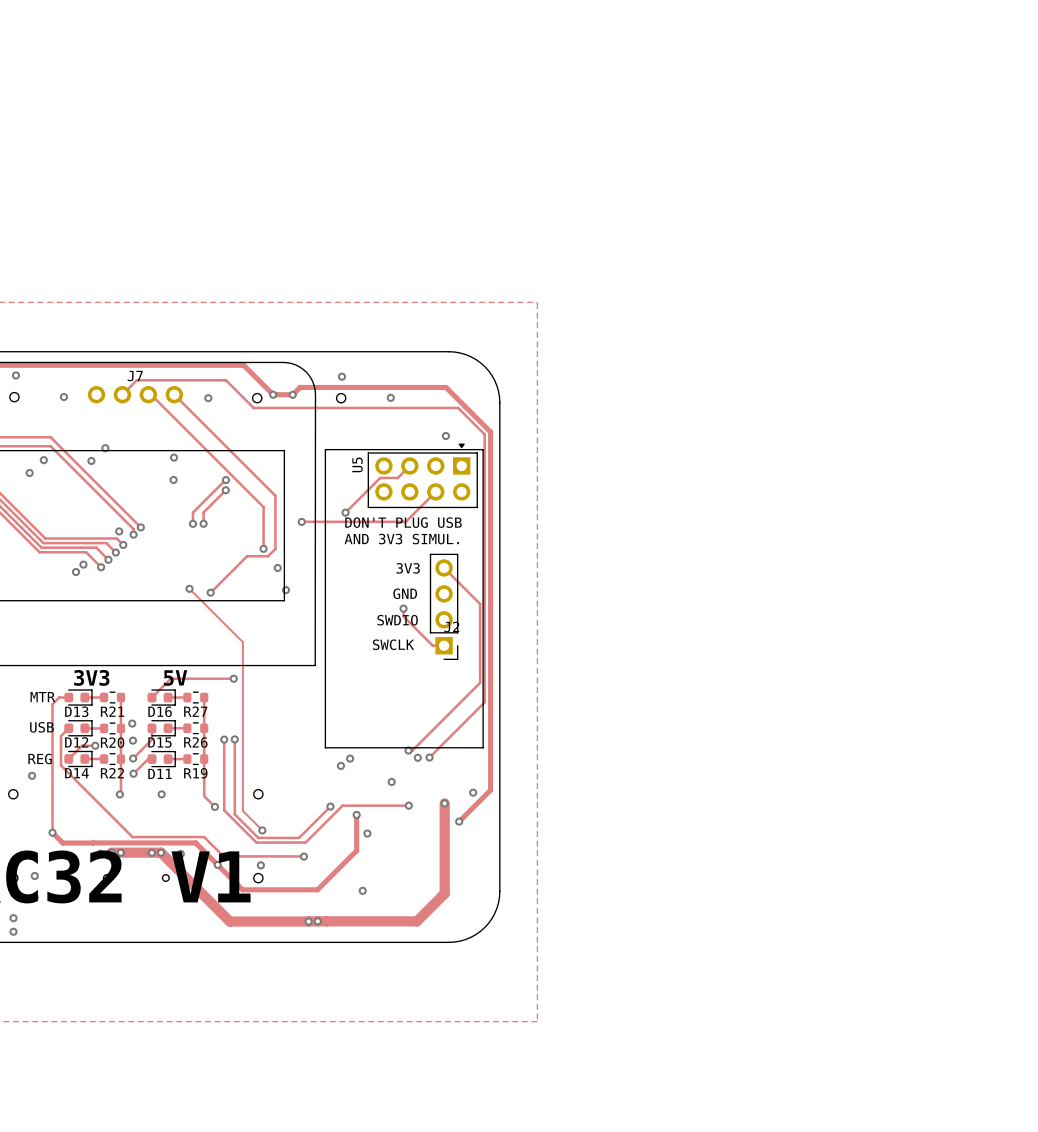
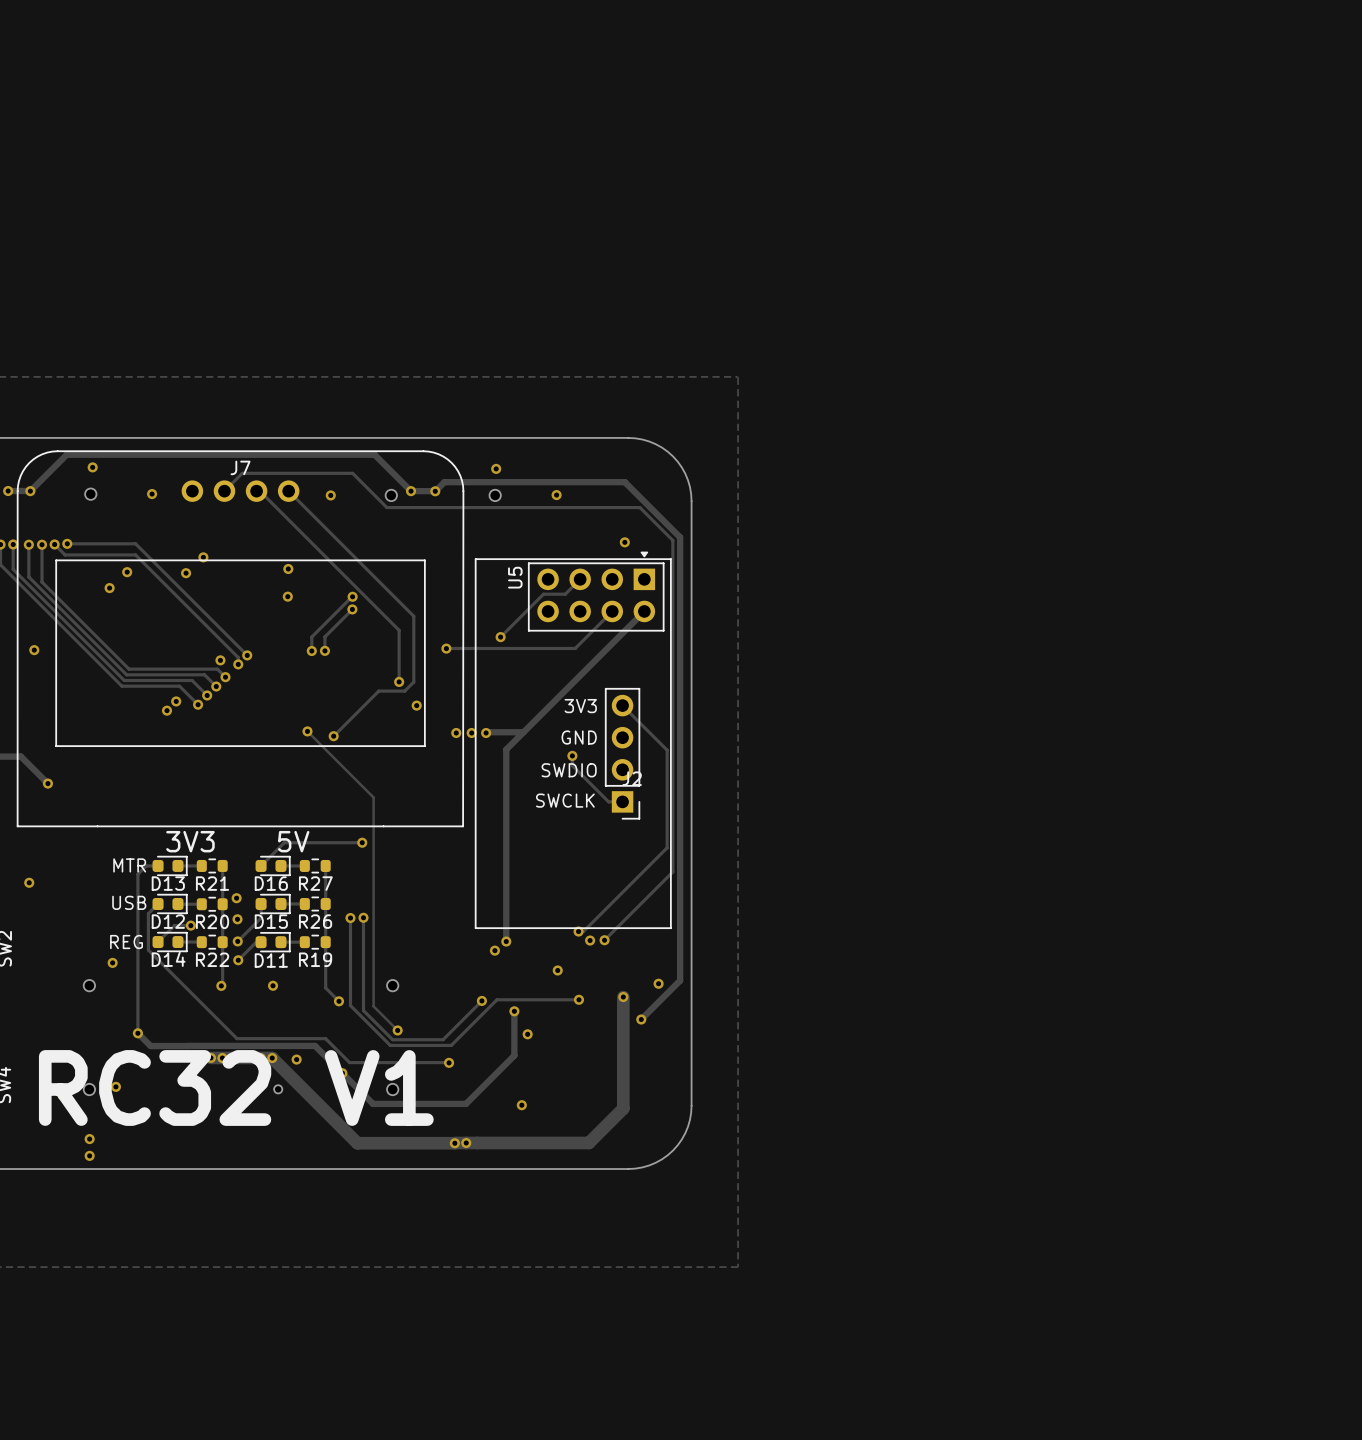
track: none -> (644, 611) (506, 749) (506, 941)
text: DON'T PLUG USB (403, 522) -> none
text: AND 3V3 SIMUL. (401, 539) -> none
track: none -> (523, 732) (486, 733)
via: (286, 590) -> none
via: none -> (456, 733)
via: none -> (471, 733)
via: none -> (486, 733)

